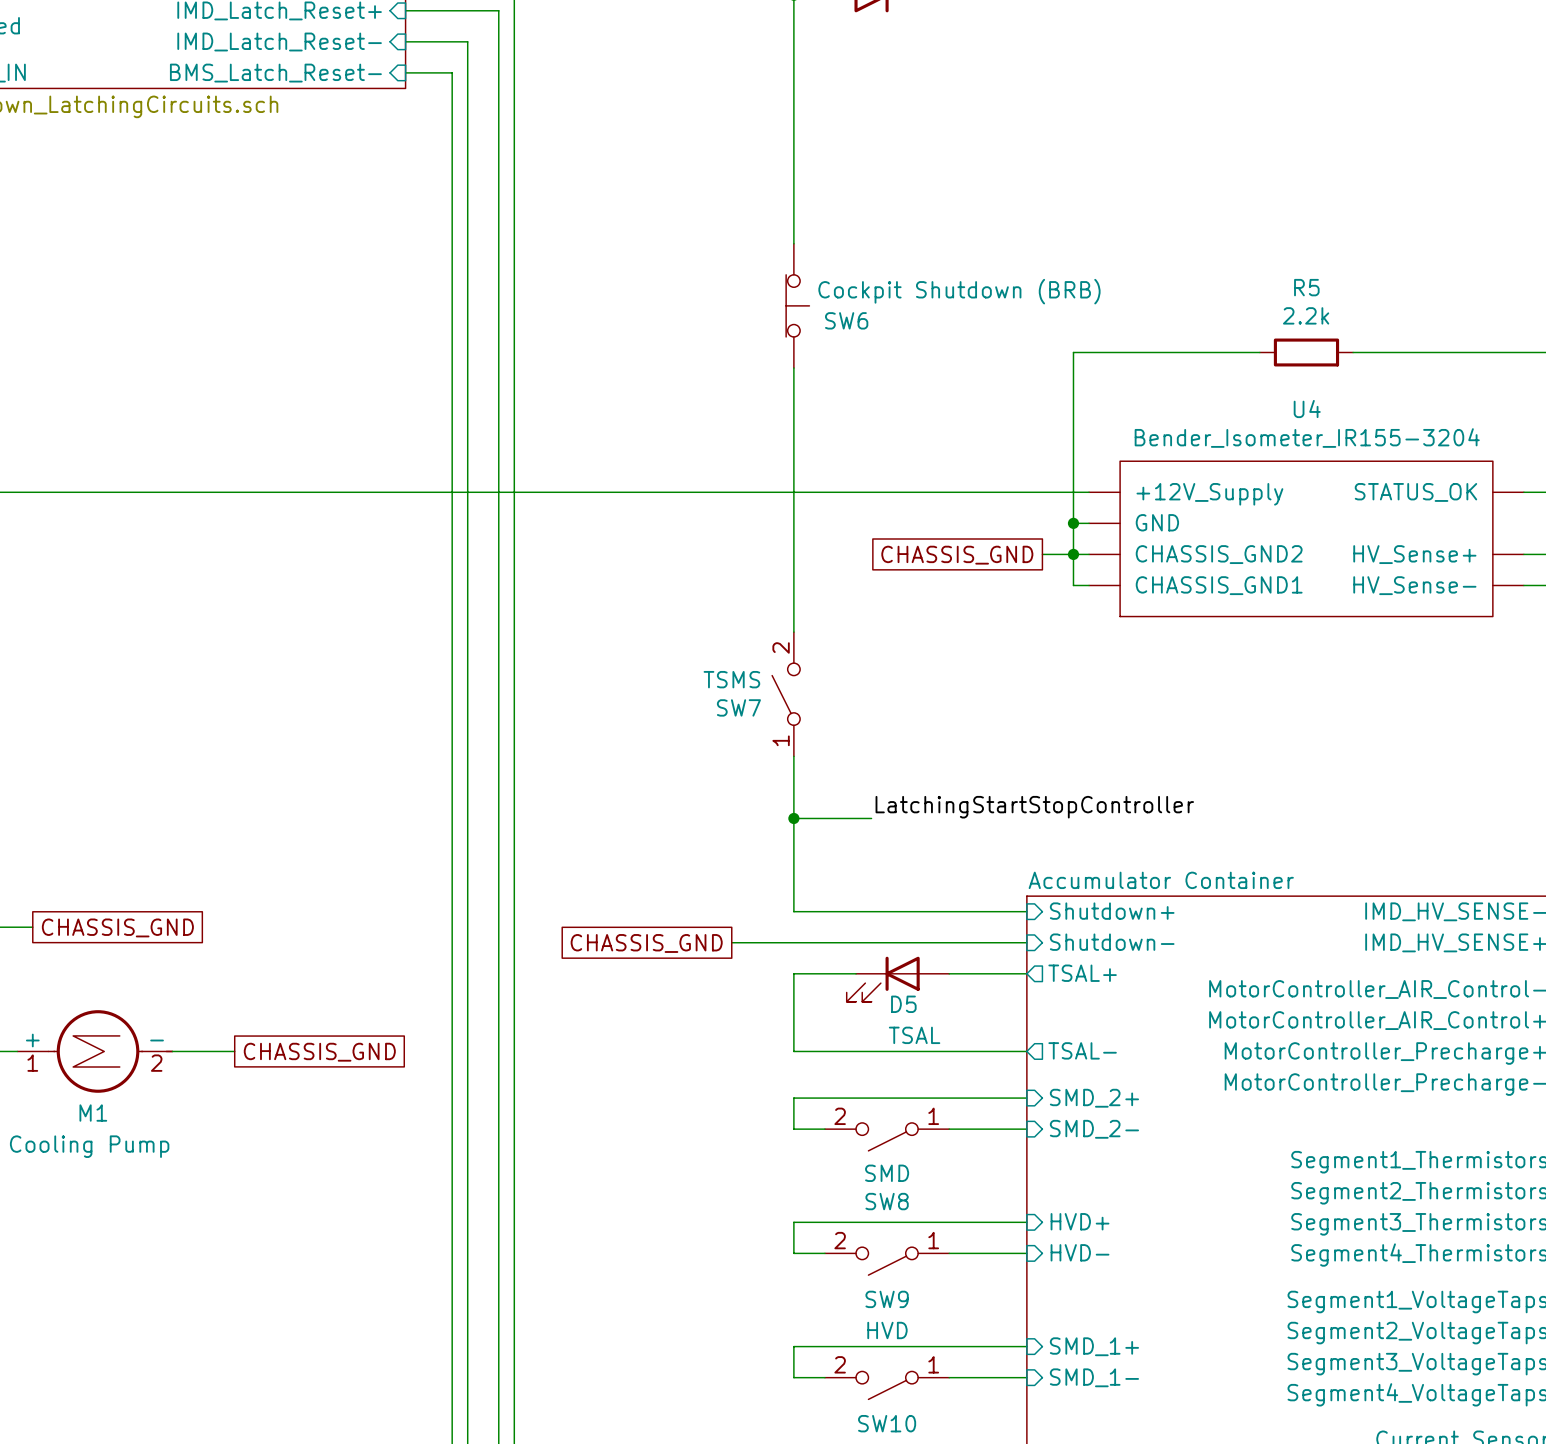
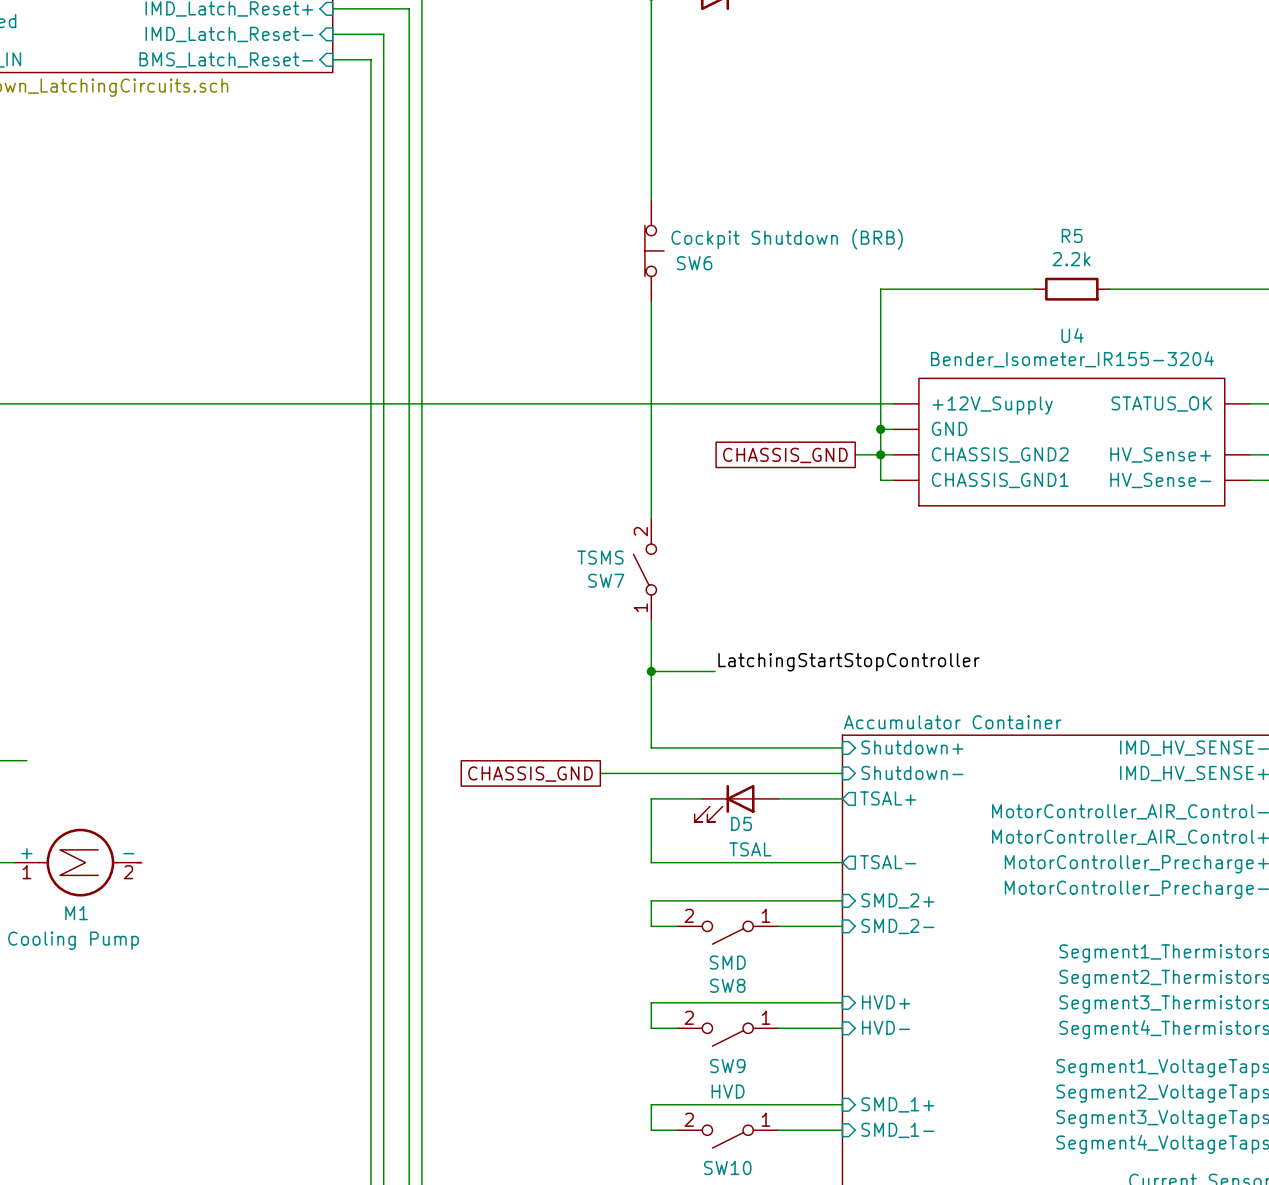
global label: CHASSIS_GND (117, 927) -> none
wire: (172, 1051) (234, 1051) -> none
global label: CHASSIS_GND (319, 1052) -> none

